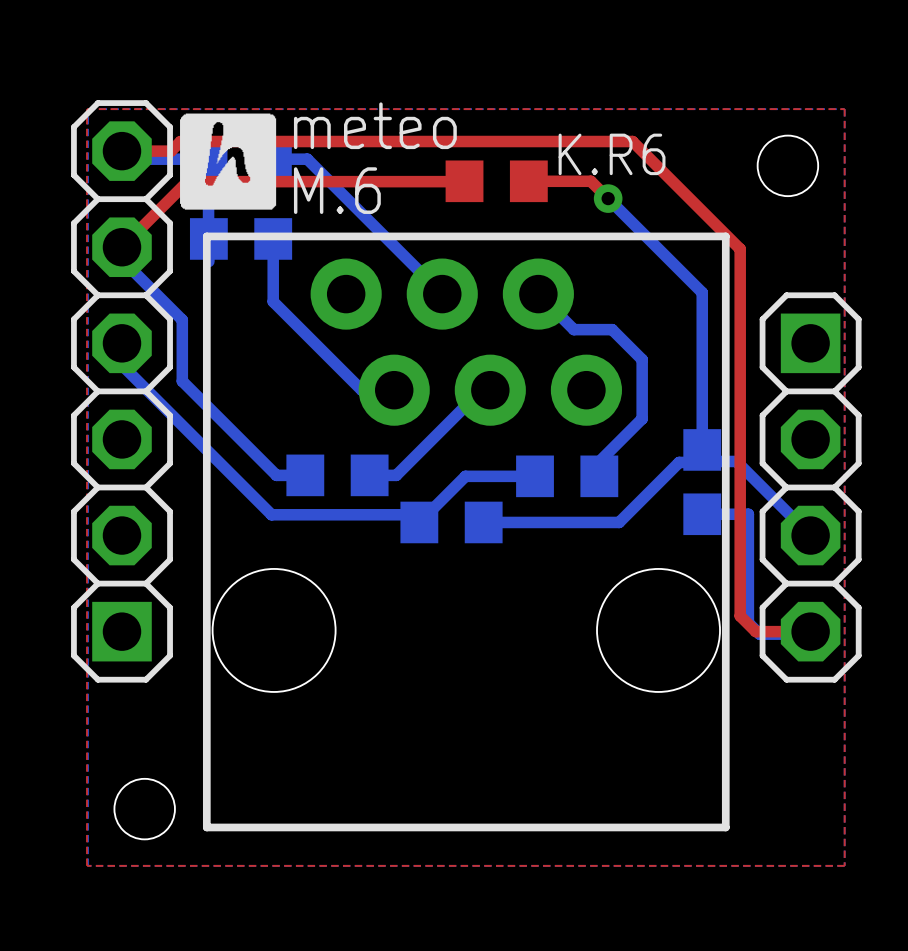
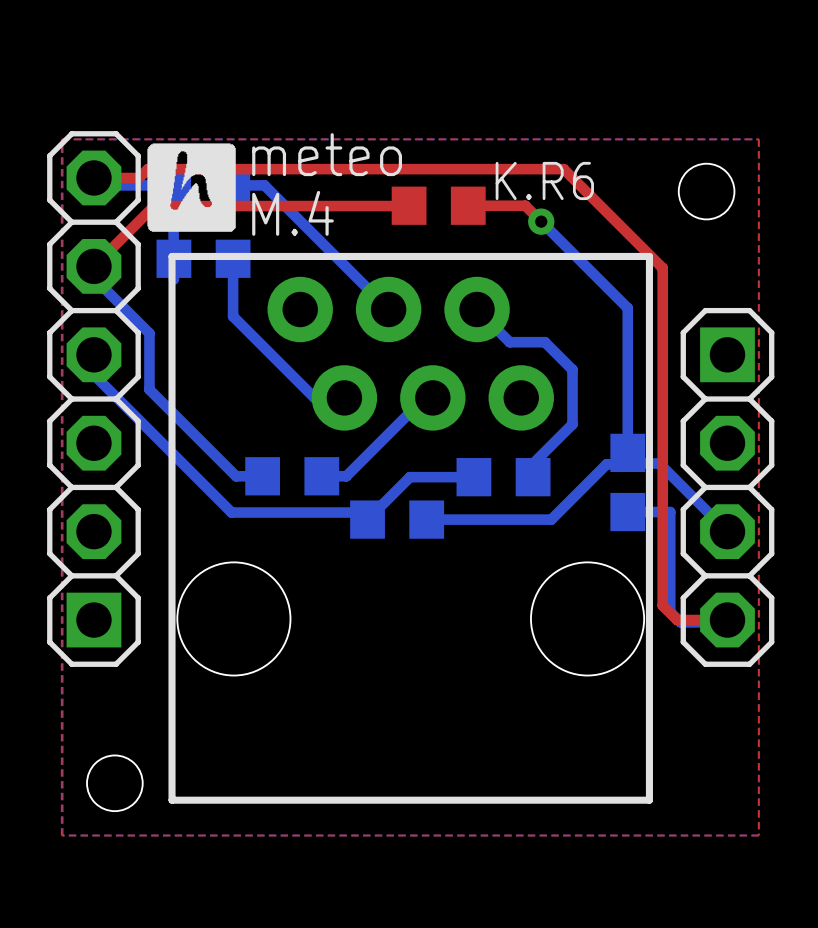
text: M.6 (337, 190) -> M.4 (292, 213)

